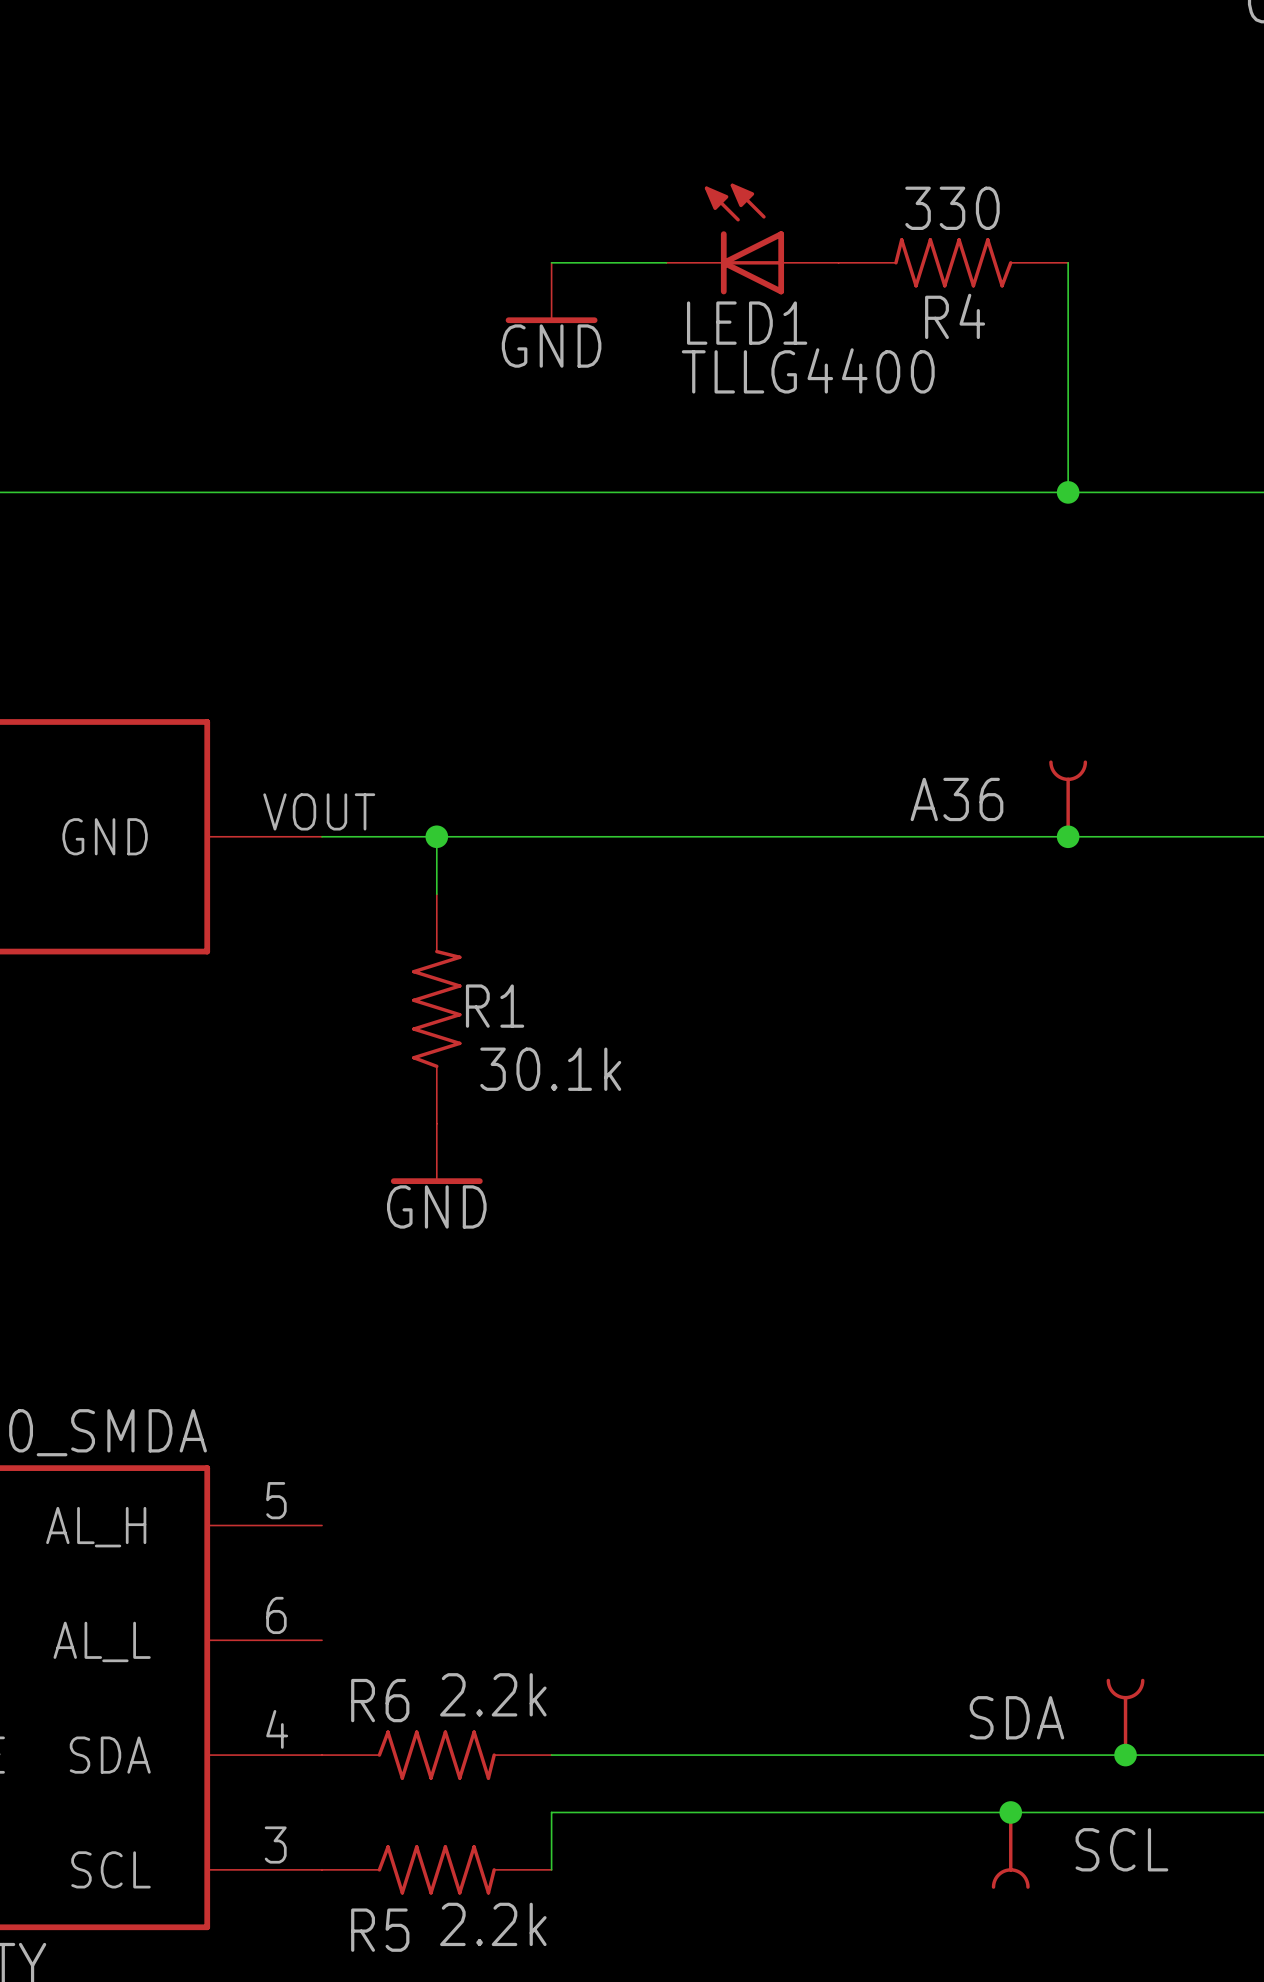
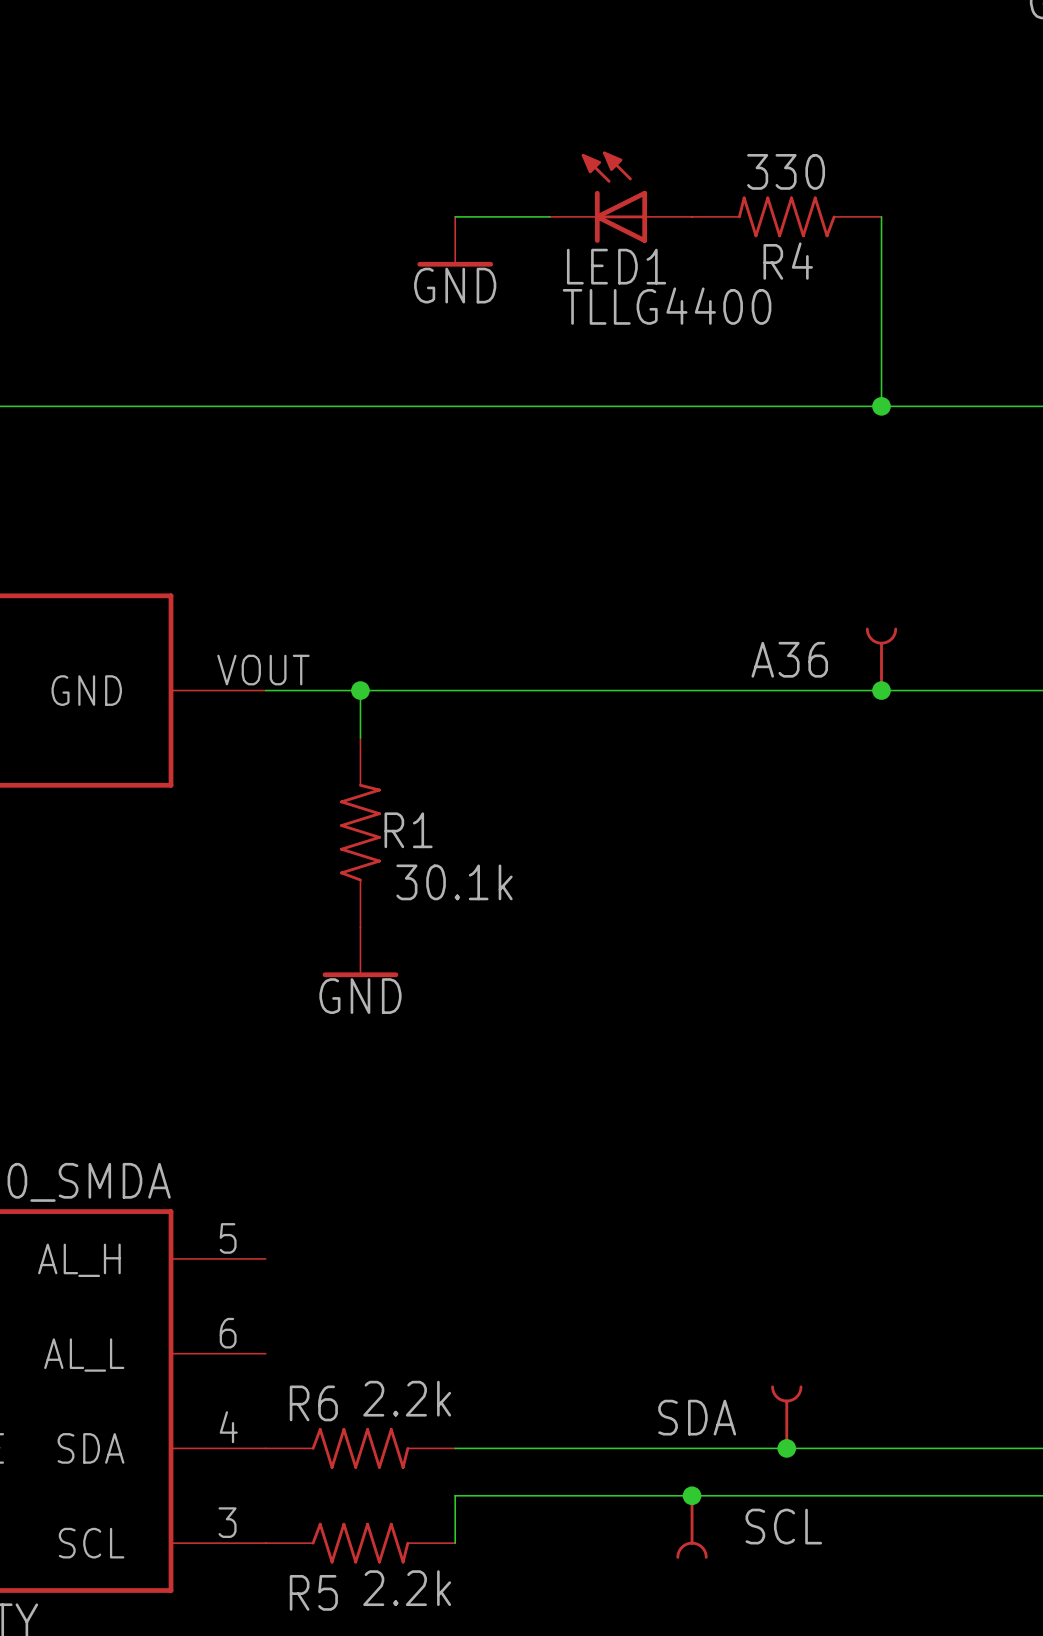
SDA position: (1125, 1717) -> (786, 1417)
junction: (1125, 1755) -> none
junction: none -> (692, 1495)
junction position: (1010, 1812) -> (786, 1448)
SCL position: (1010, 1849) -> (692, 1526)

